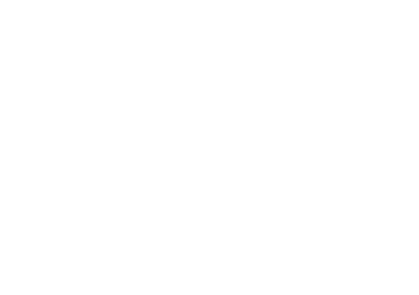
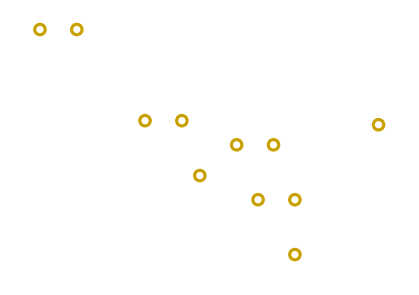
part: none -> (39, 29)
part: none -> (76, 29)
part: none -> (145, 120)
part: none -> (181, 120)
part: none -> (378, 124)
part: none -> (236, 144)
part: none -> (273, 144)
part: none -> (199, 175)
part: none -> (258, 199)
part: none -> (294, 199)
part: none -> (294, 254)

